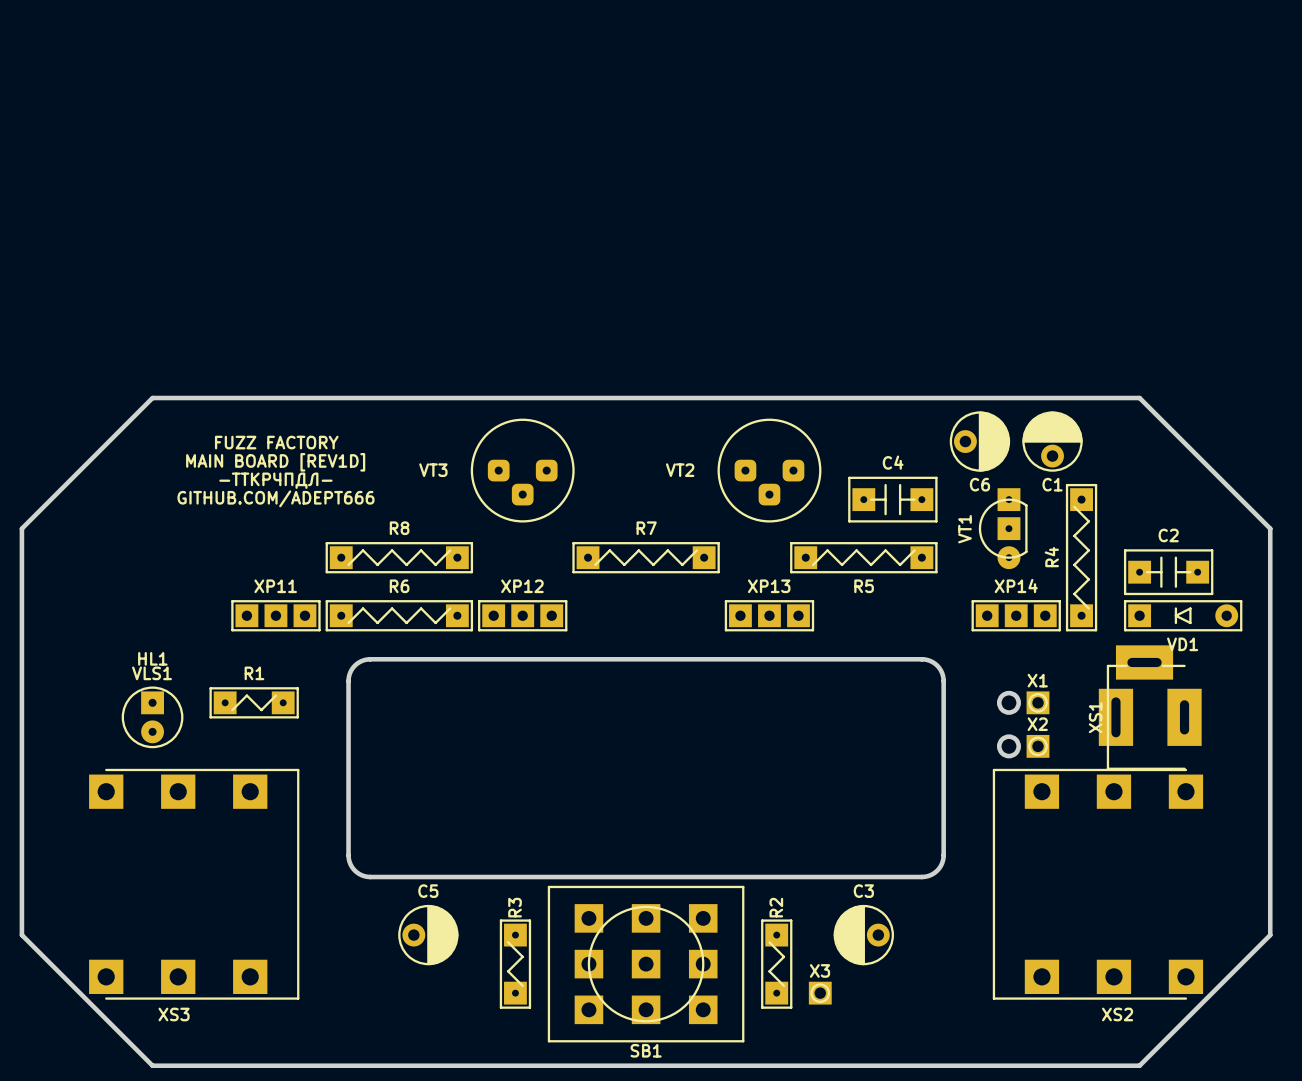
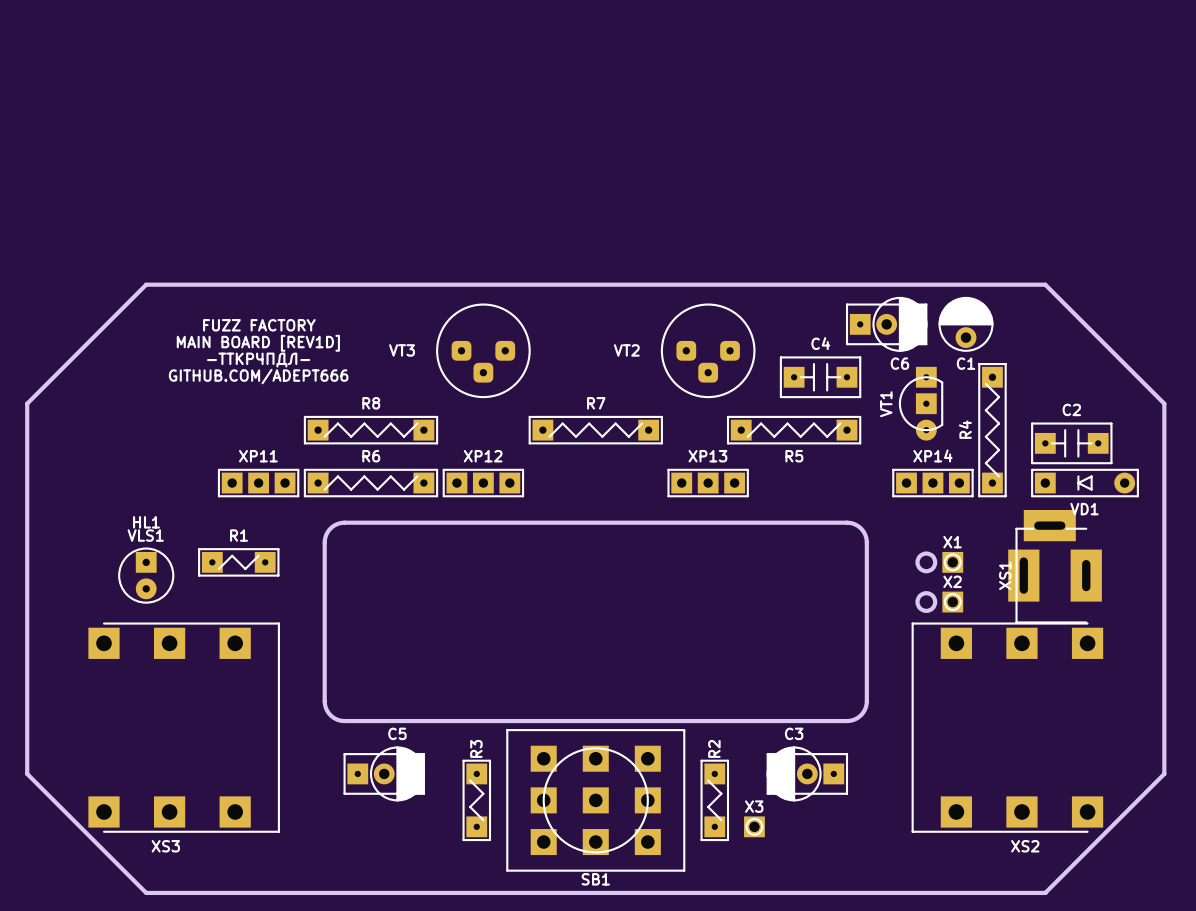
C6 footprint: [949, 411, 1011, 472] -> [845, 296, 928, 352]
C5 footprint: [398, 904, 459, 966] -> [343, 746, 425, 802]
C3 footprint: [833, 904, 895, 966] -> [766, 746, 849, 802]

